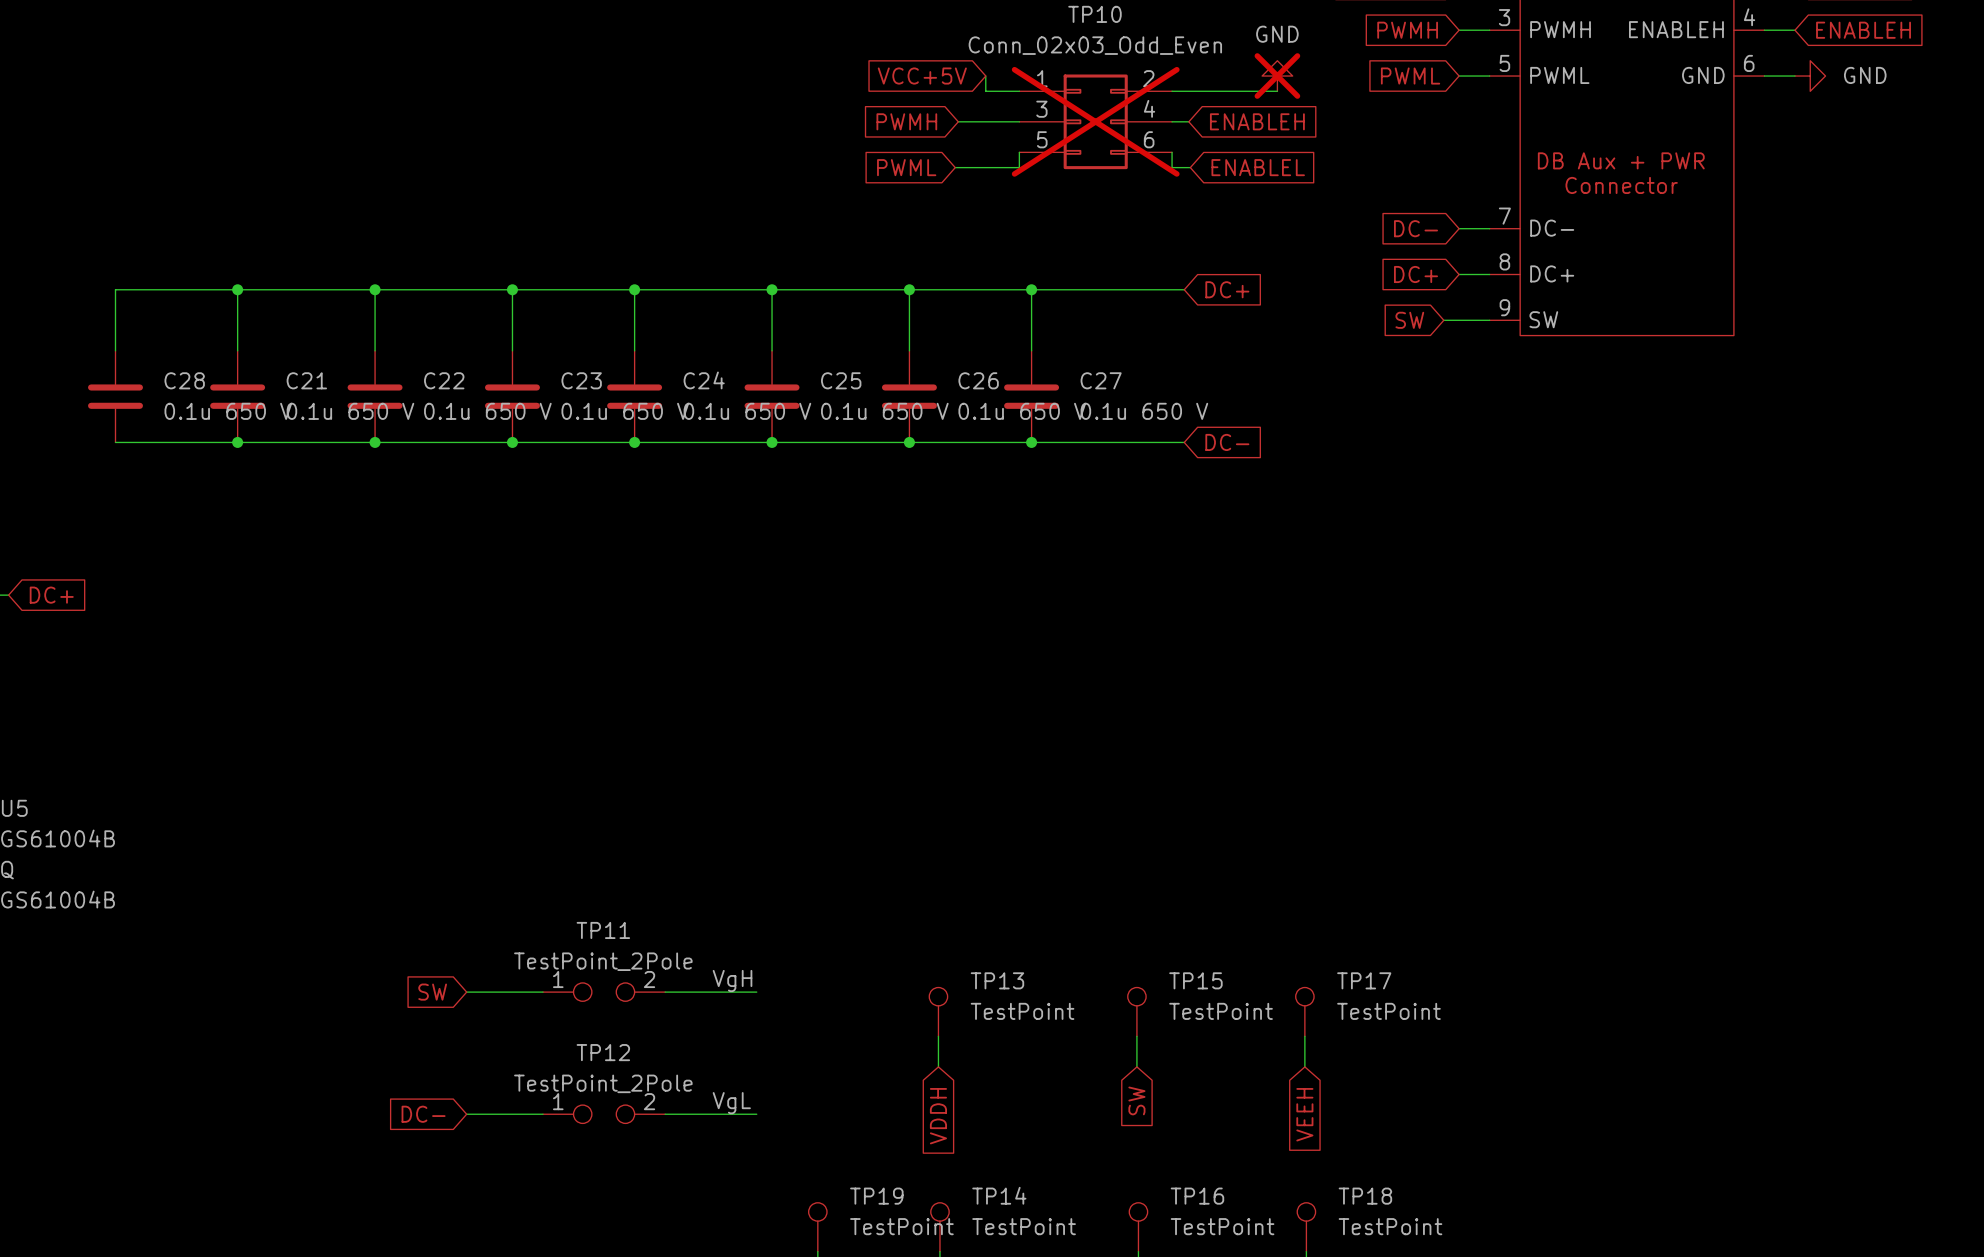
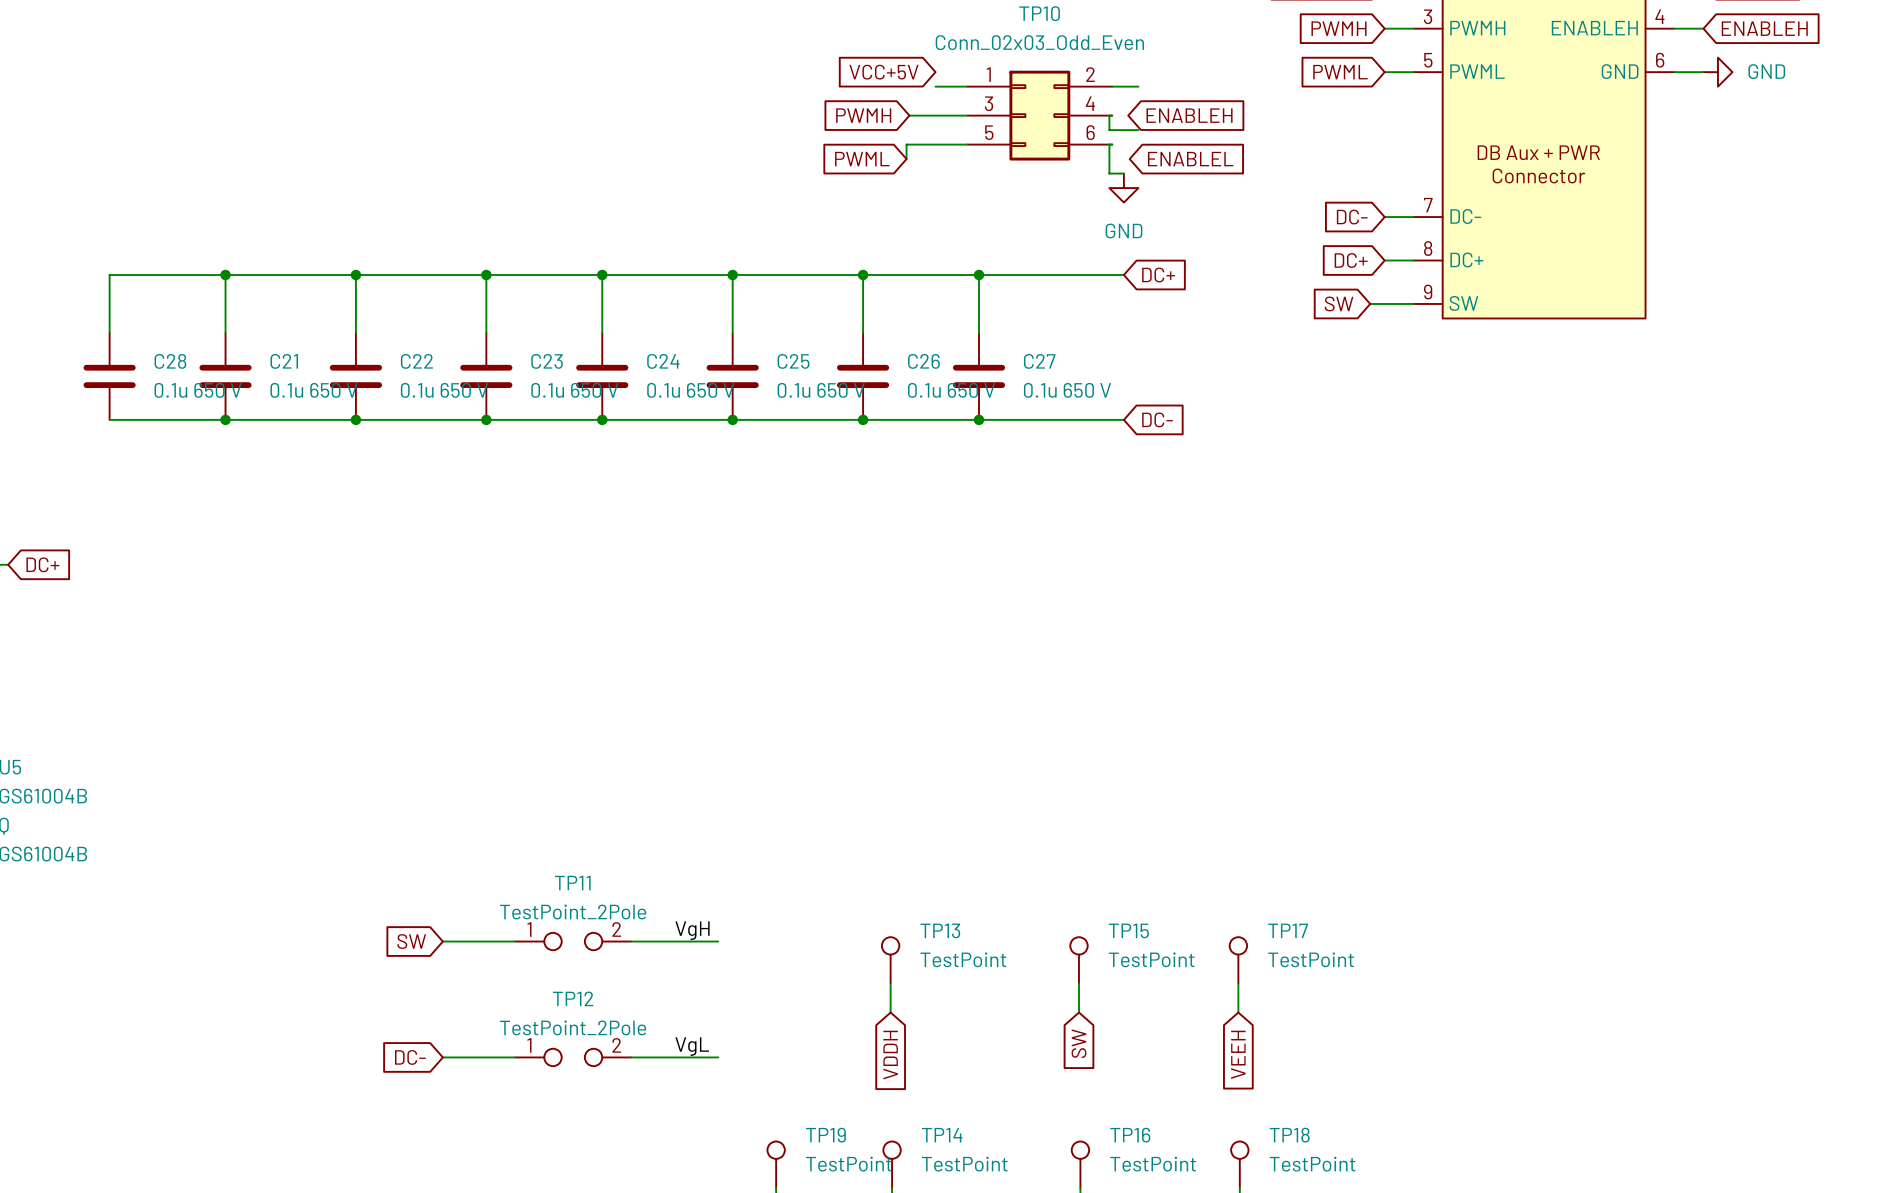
wire: (985, 76) (985, 91) -> none
power symbol rotation: 0° (1277, 76) -> 180° (1123, 188)
power symbol position: GND (1277, 76) -> GND (1123, 188)
power symbol do-not-place cross: (1277, 76) -> none
wire: (1199, 91) (1277, 91) -> none
TP10 do-not-place cross: (1095, 121) -> none
wire: (1172, 121) (1188, 121) -> (1112, 115) (1109, 115) (1109, 130) (1138, 130)
wire: (1019, 152) (1019, 167) (955, 167) -> (967, 144) (906, 144) (906, 159)
wire: (1172, 152) (1172, 167) (1190, 167) -> (1112, 144) (1109, 144) (1109, 173) (1123, 173)

